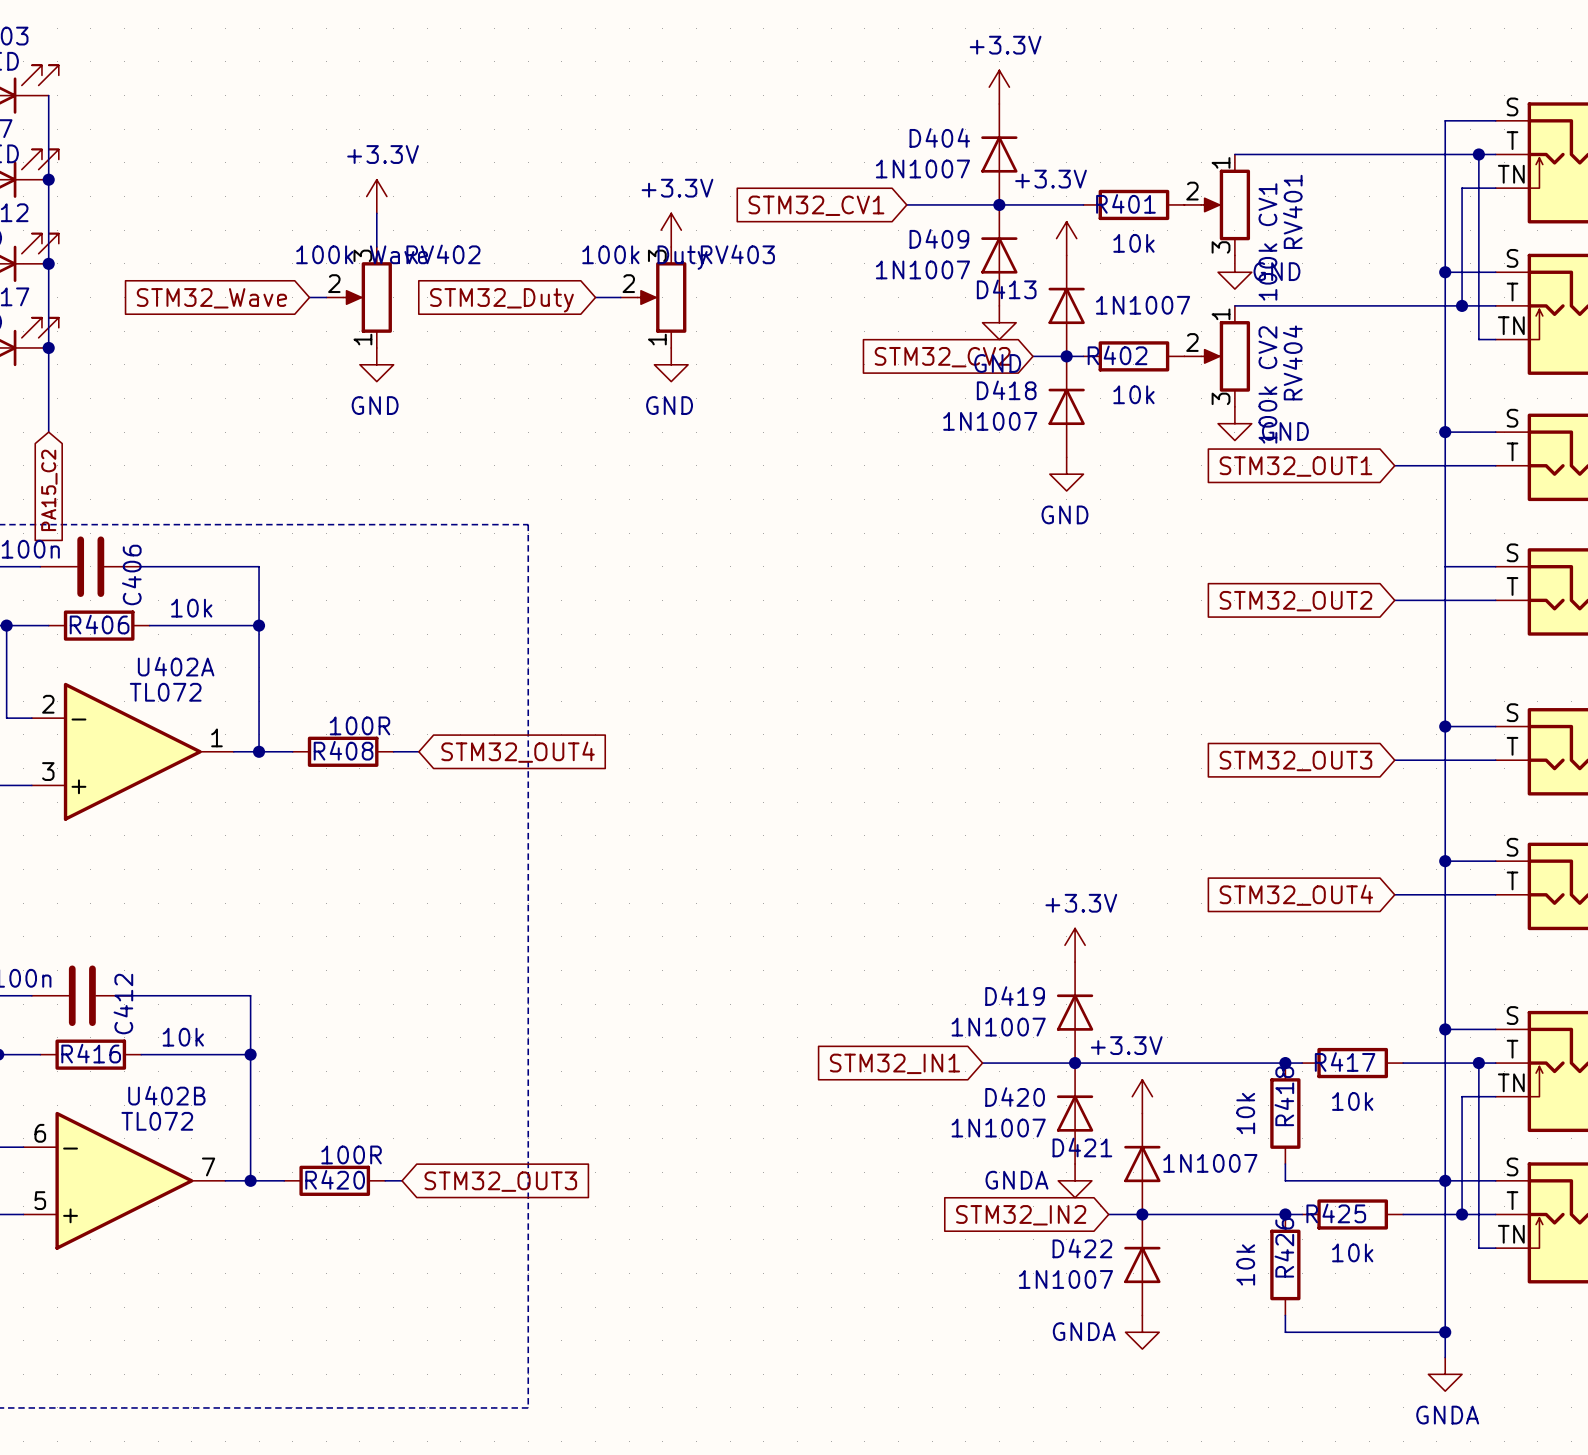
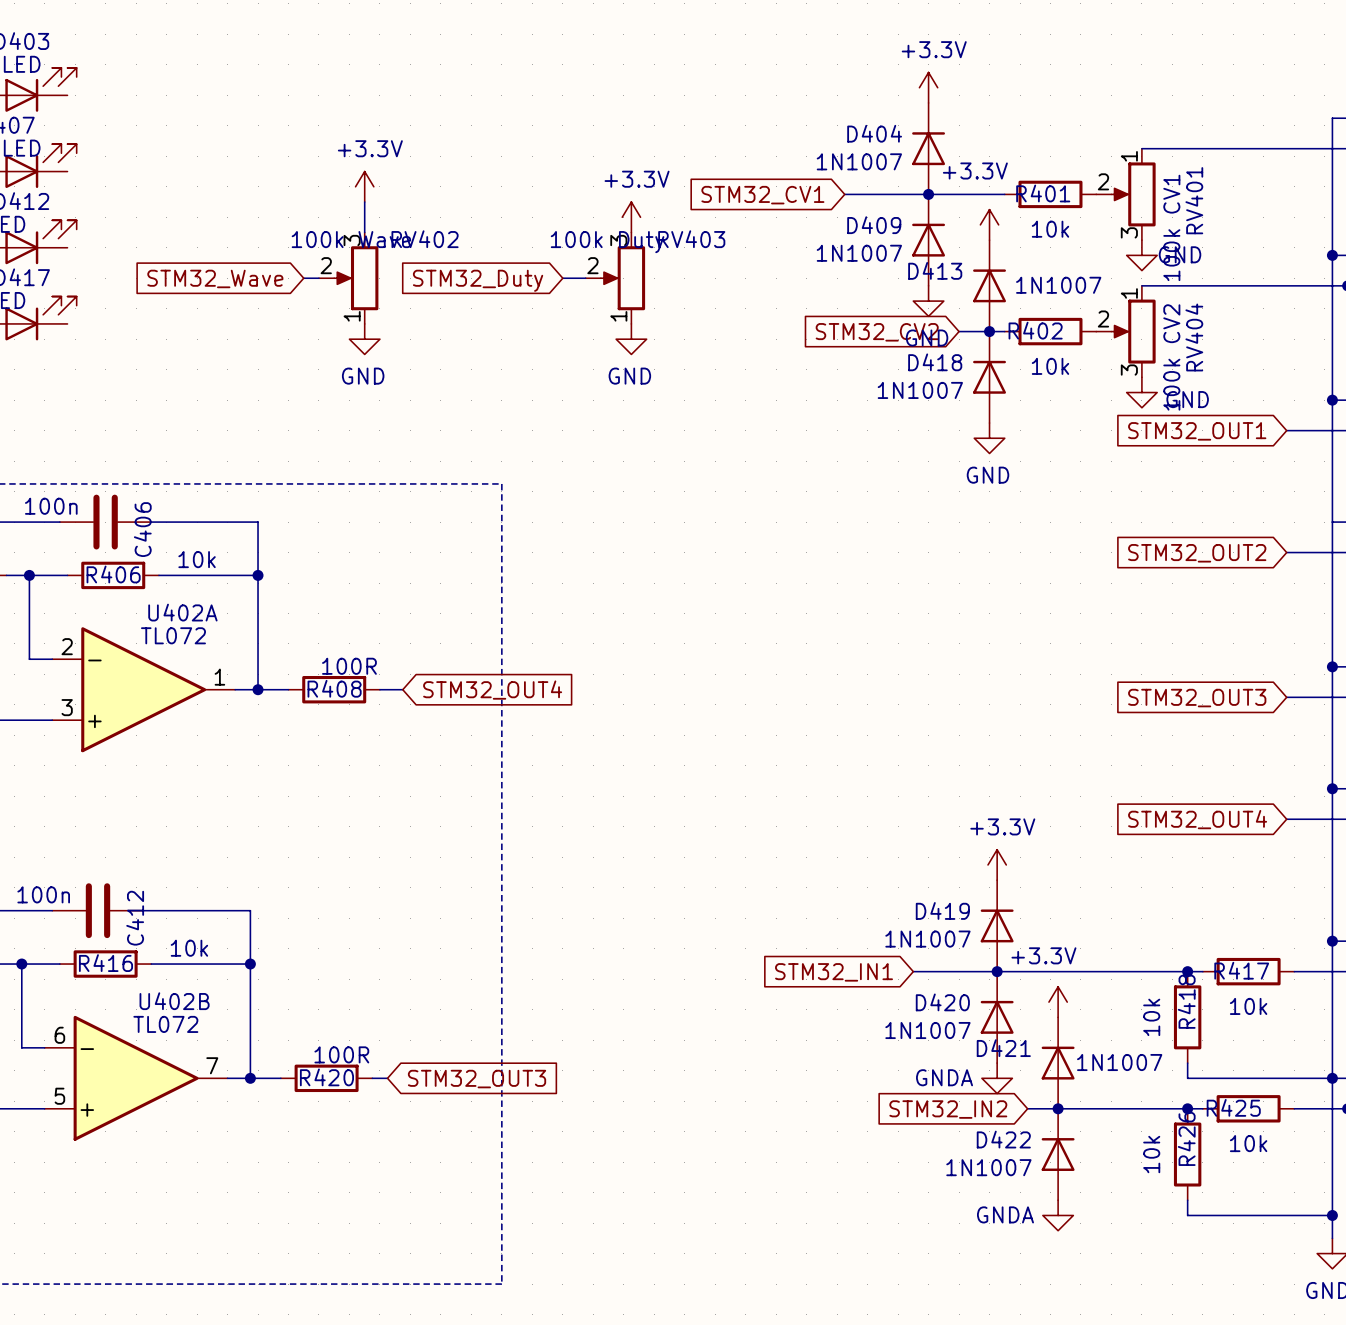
wire: (48, 95) (48, 432) -> none
junction: (48, 179) -> none
junction: (48, 263) -> none
junction: (48, 347) -> none
global label: PA15_C2 (49, 490) -> none

